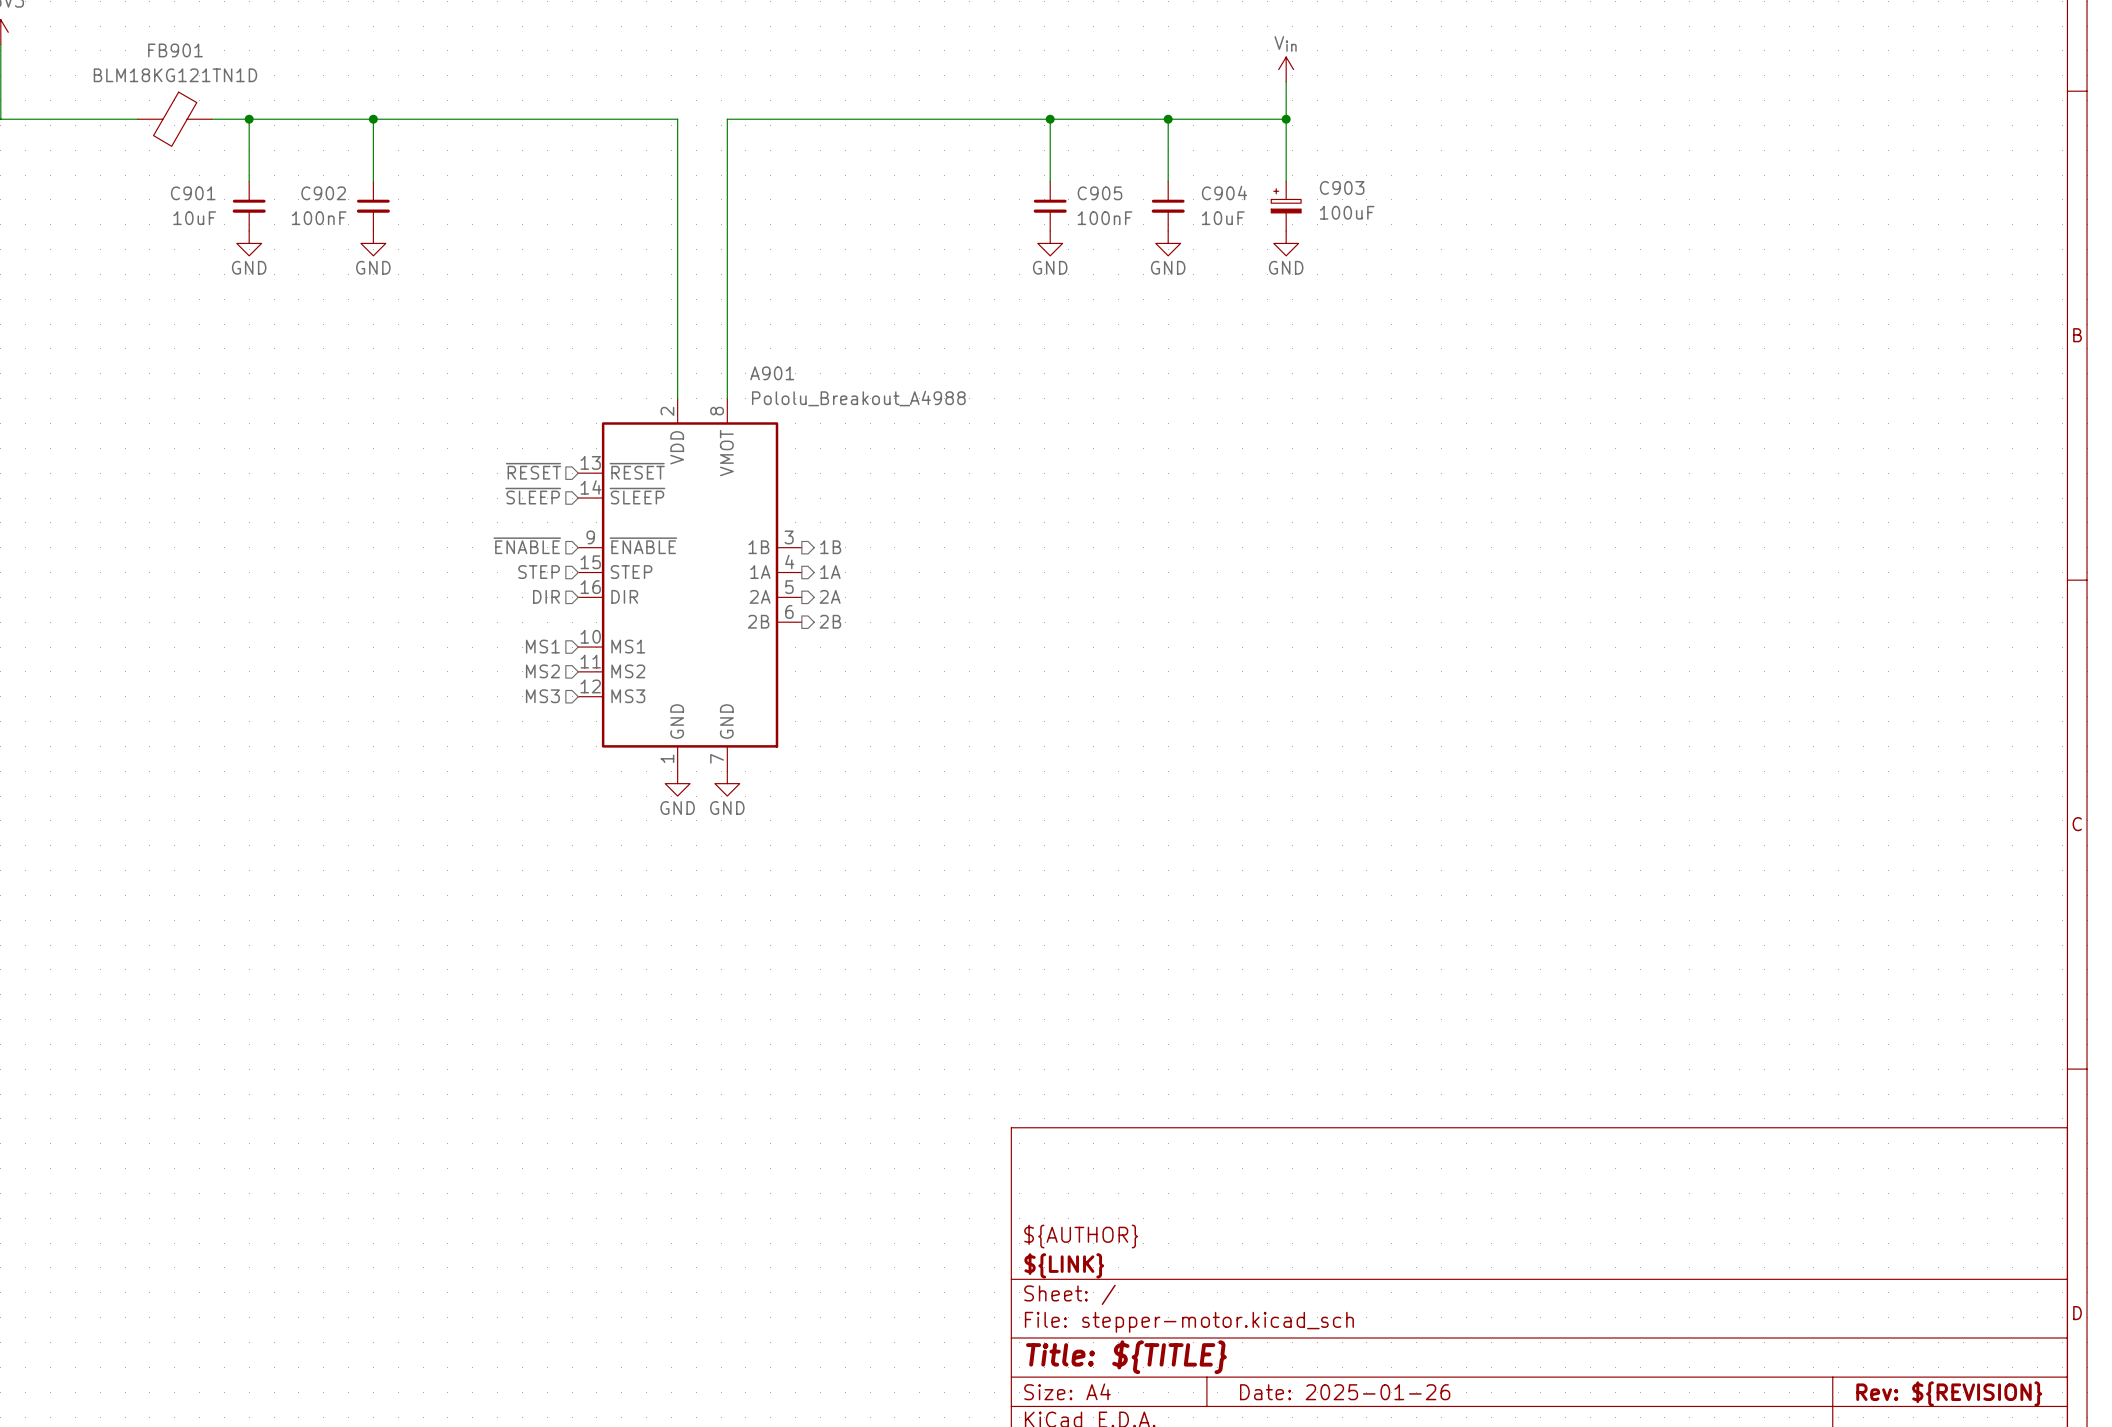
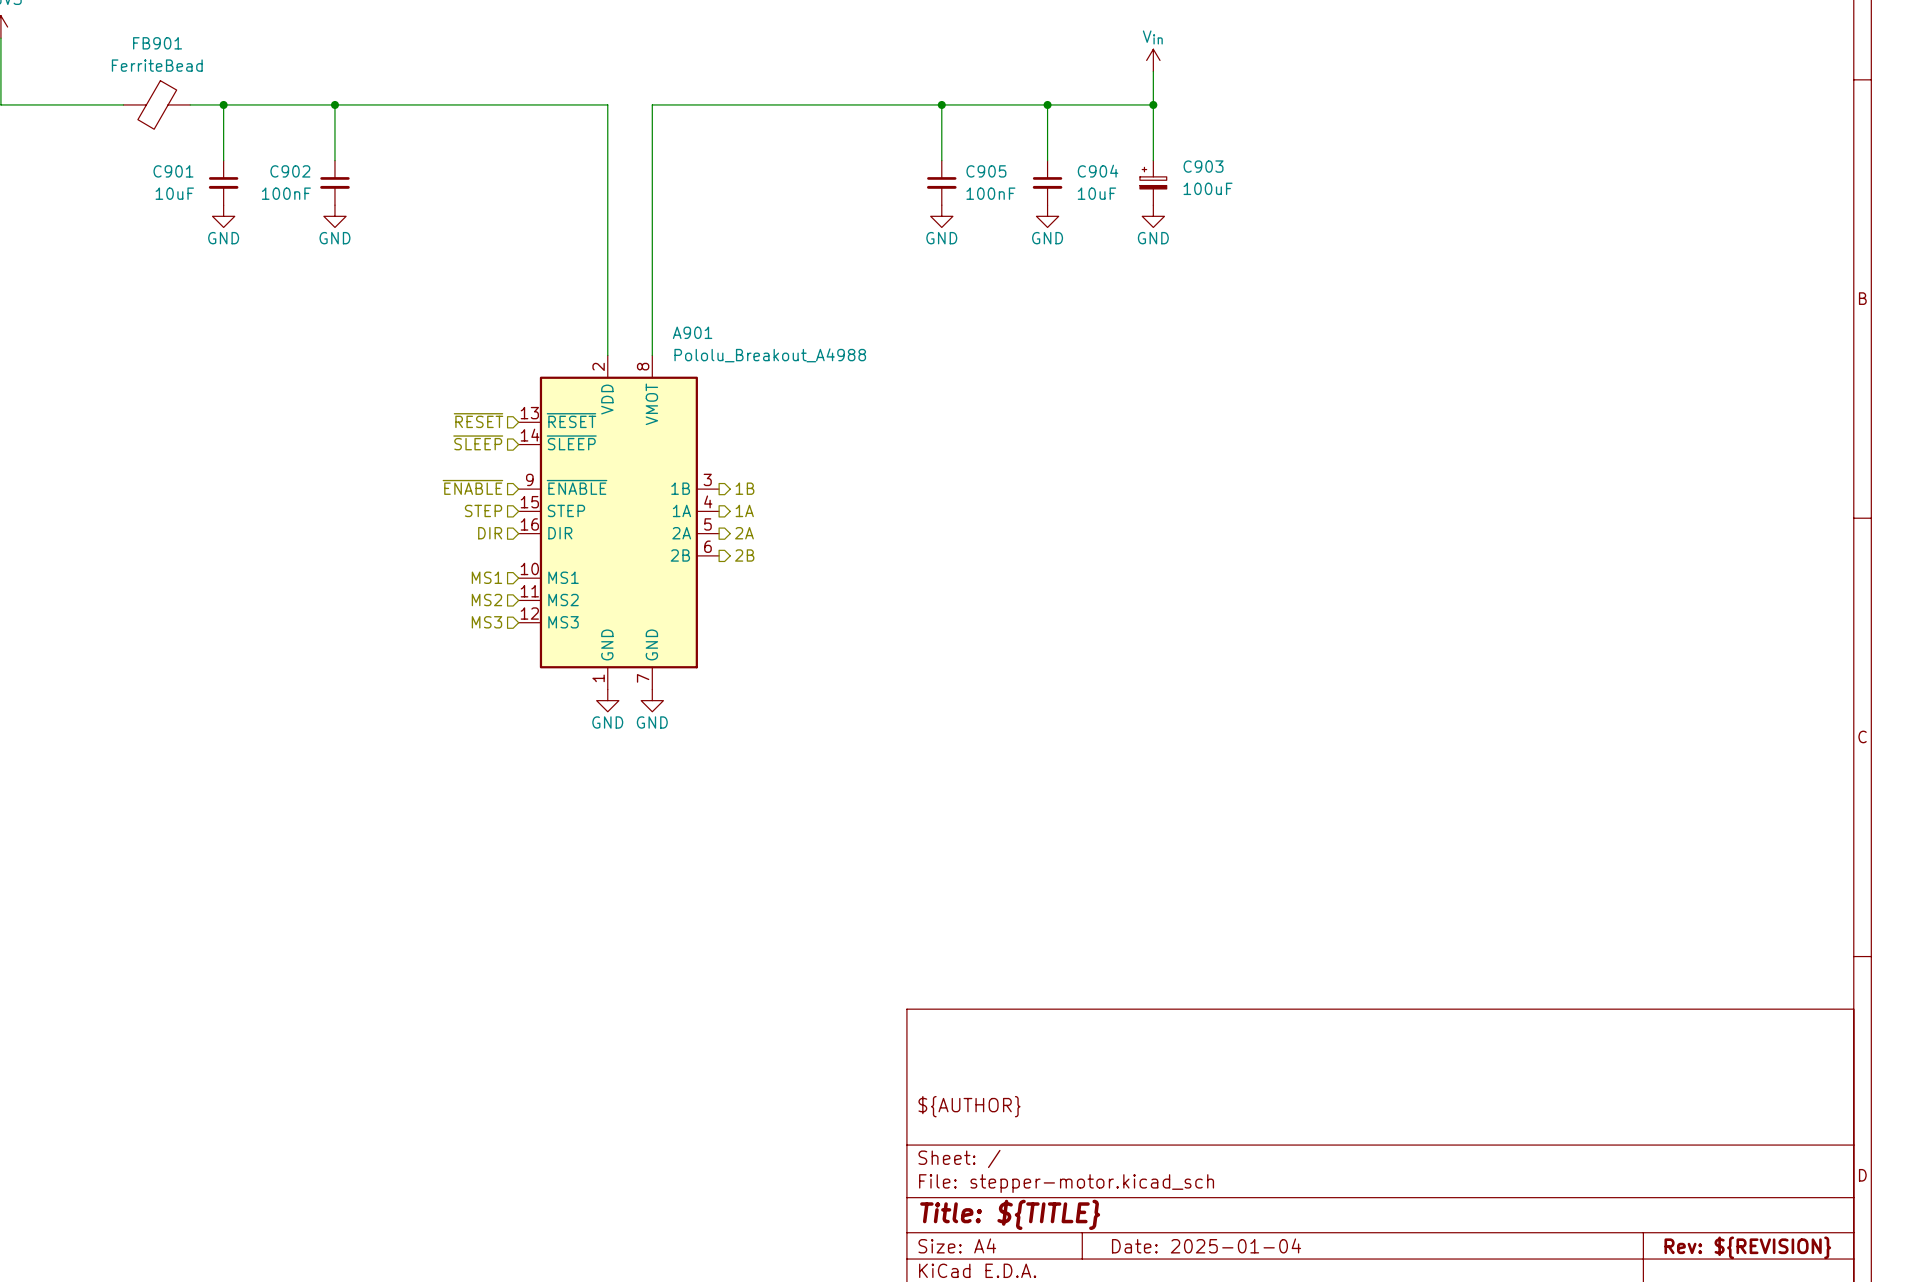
FB901 value: BLM18KG121TN1D (175, 75) -> FerriteBead (157, 65)
title block: ${LINK} (1064, 1265) -> none
title block: Date: 2025-01-26 (1345, 1392) -> Date: 2025-01-04 (1206, 1245)

